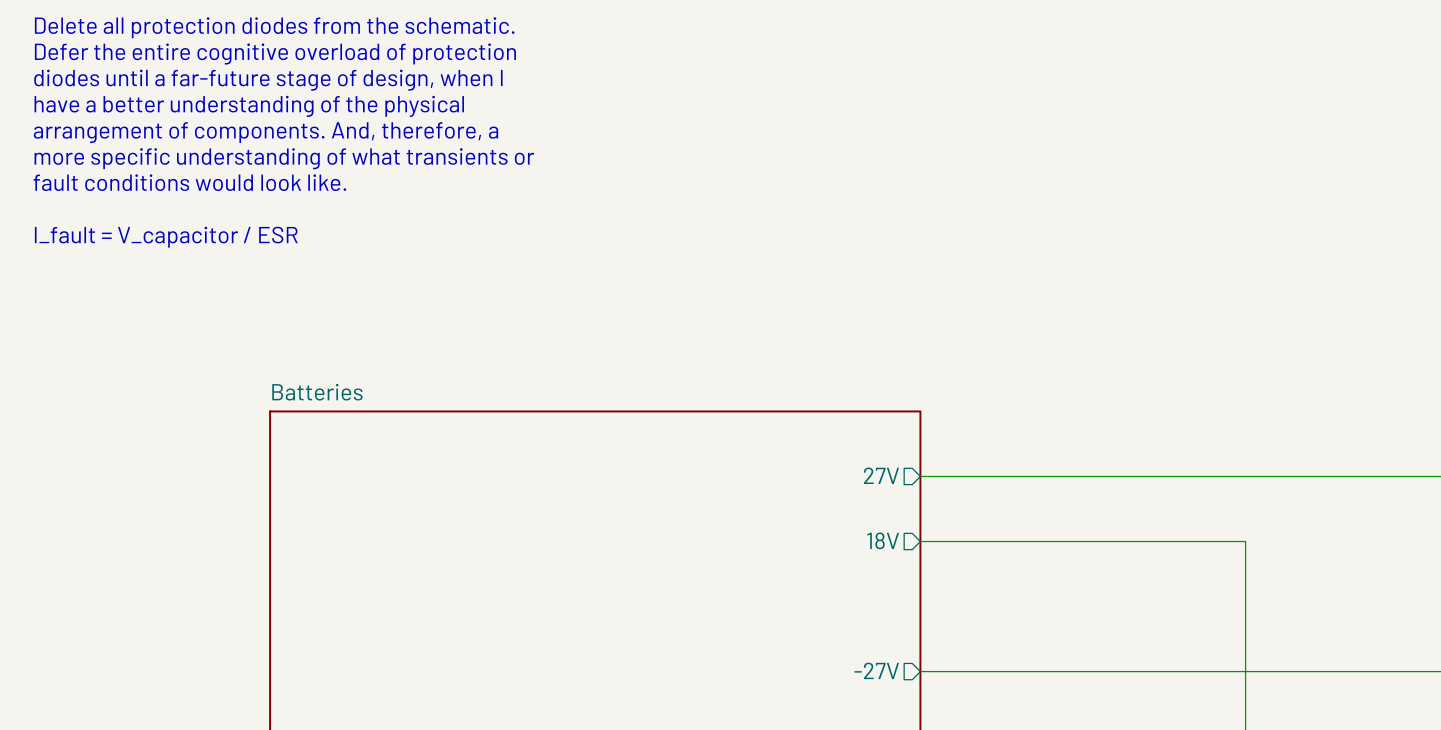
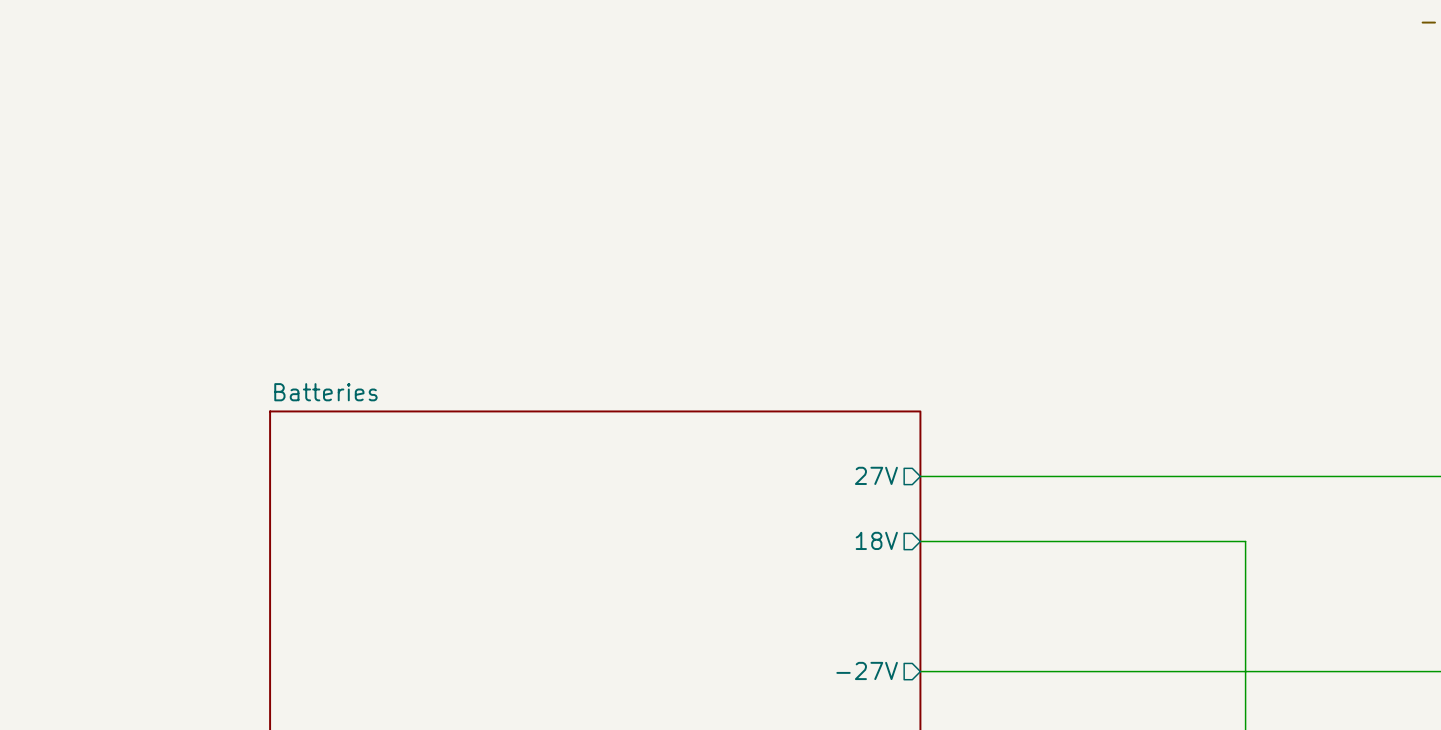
text: Delete all protection diodes from the schematic. (274, 27) -> none
text: Defer the entire cognitive overload of protection (275, 54) -> none
text: diodes until a far-future stage of design, when I (268, 80) -> none
text: have a better understanding of the physical (249, 106) -> none
text: arrangement of components. And, therefore, a (265, 132) -> none
text: more specific understanding of what transients or (284, 158) -> none
text: fault conditions would look like. (189, 182) -> none
text: I_fault = V_capacitor / ESR (166, 237) -> none

